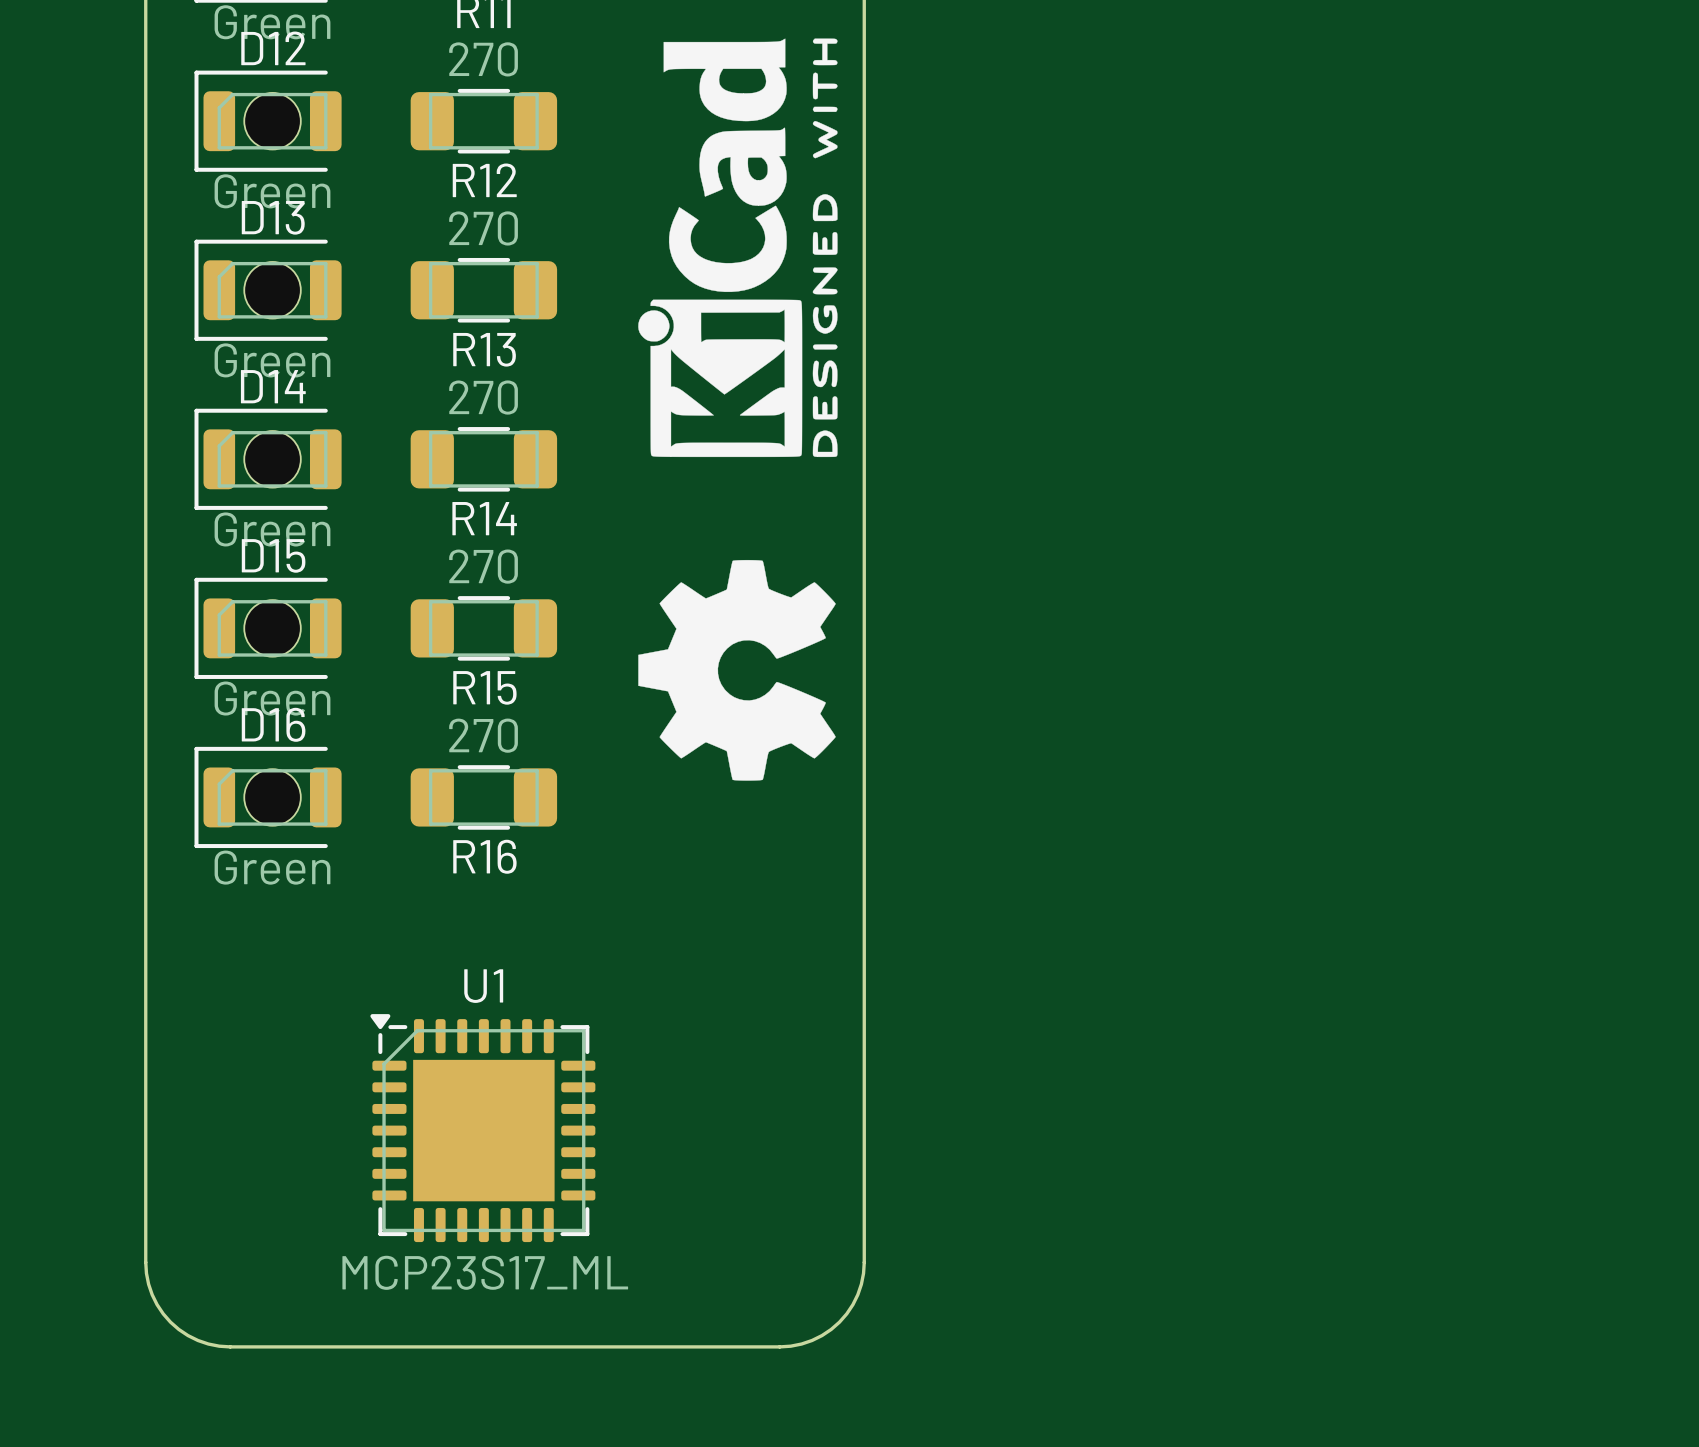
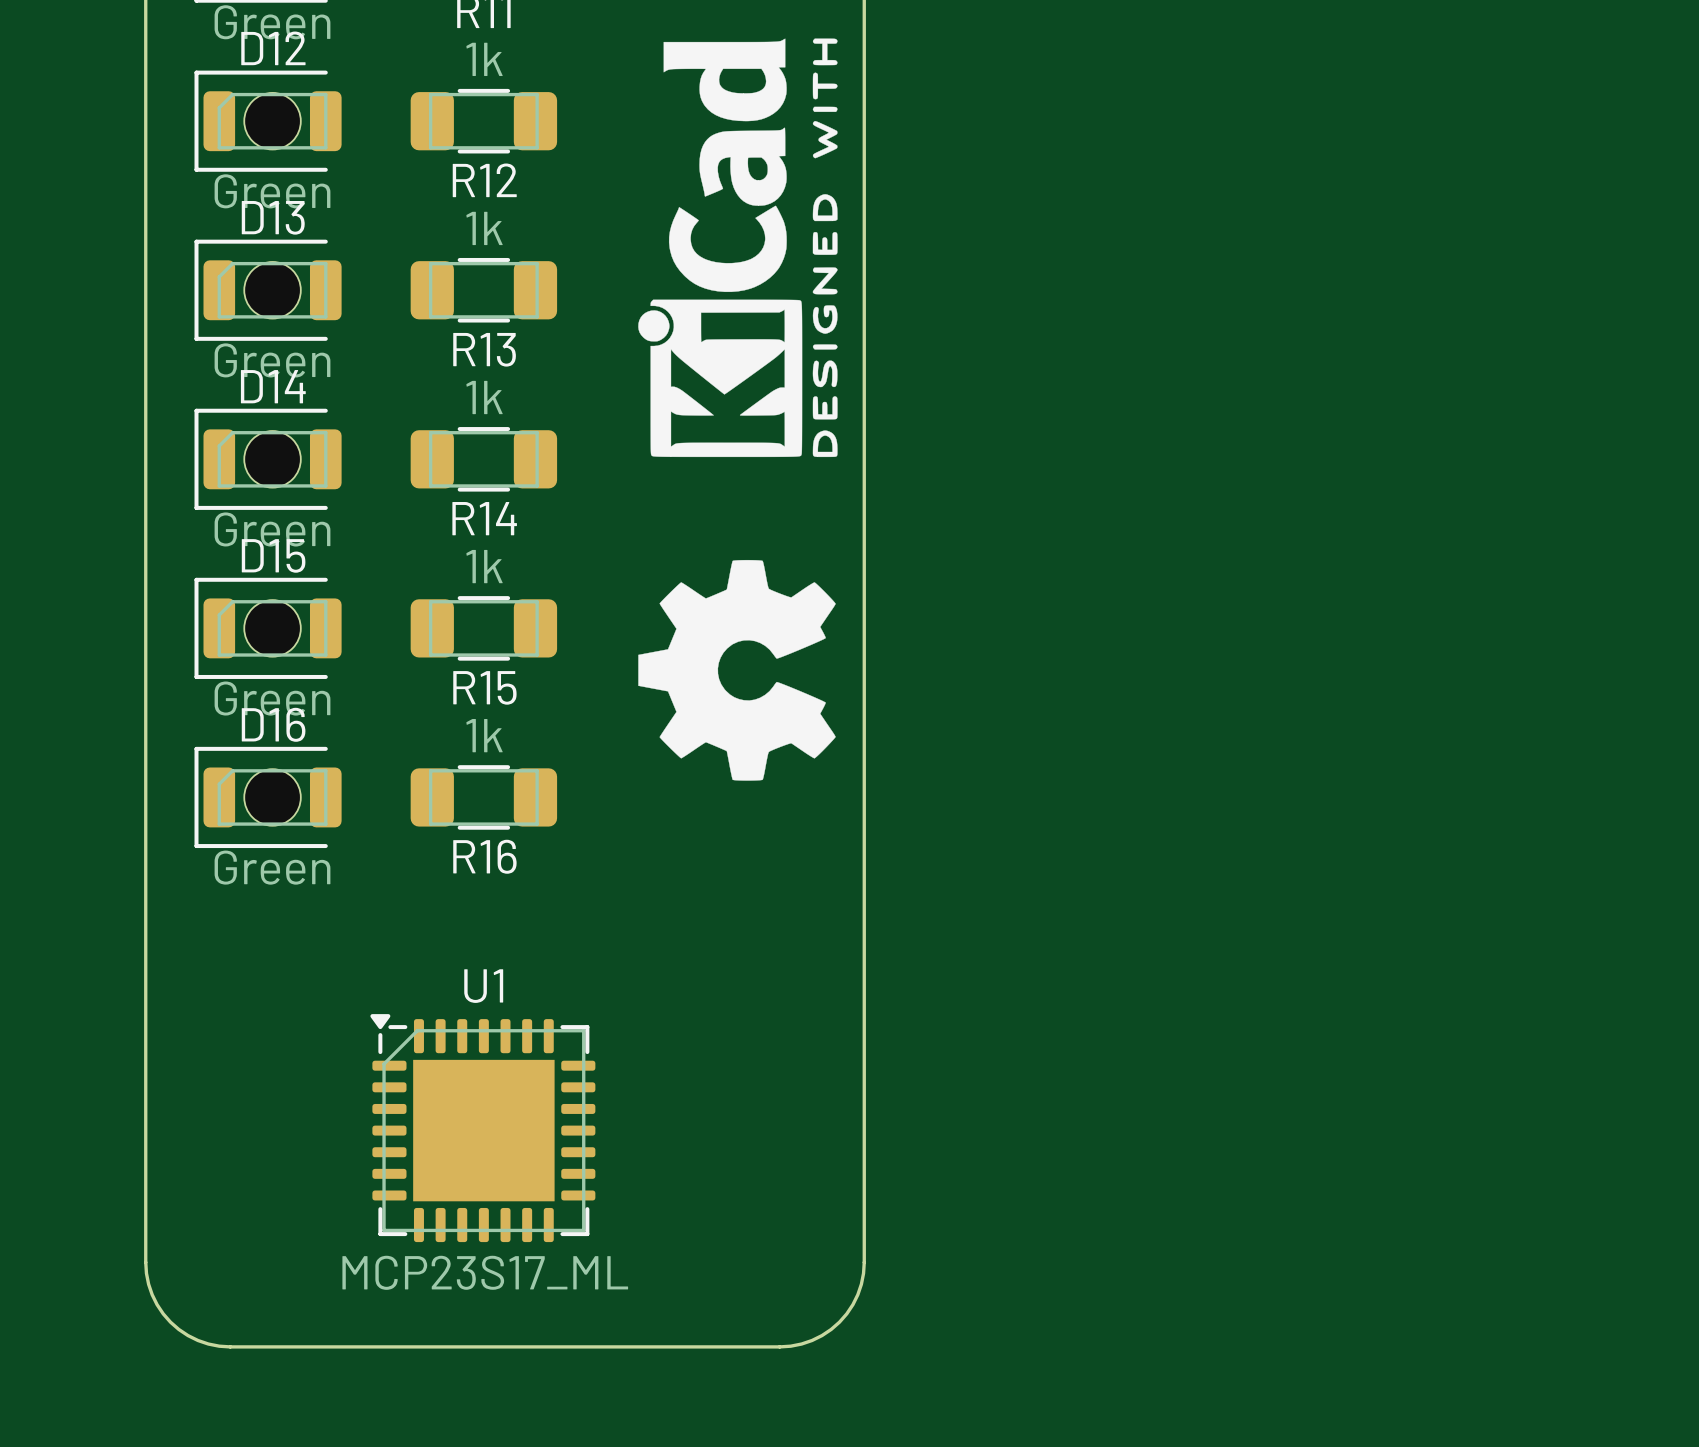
R12 value: 270 (483, 59) -> 1k (484, 59)
R13 value: 270 (483, 228) -> 1k (484, 228)
R14 value: 270 (483, 397) -> 1k (484, 397)
R15 value: 270 (483, 566) -> 1k (484, 566)
R16 value: 270 (483, 735) -> 1k (484, 735)

